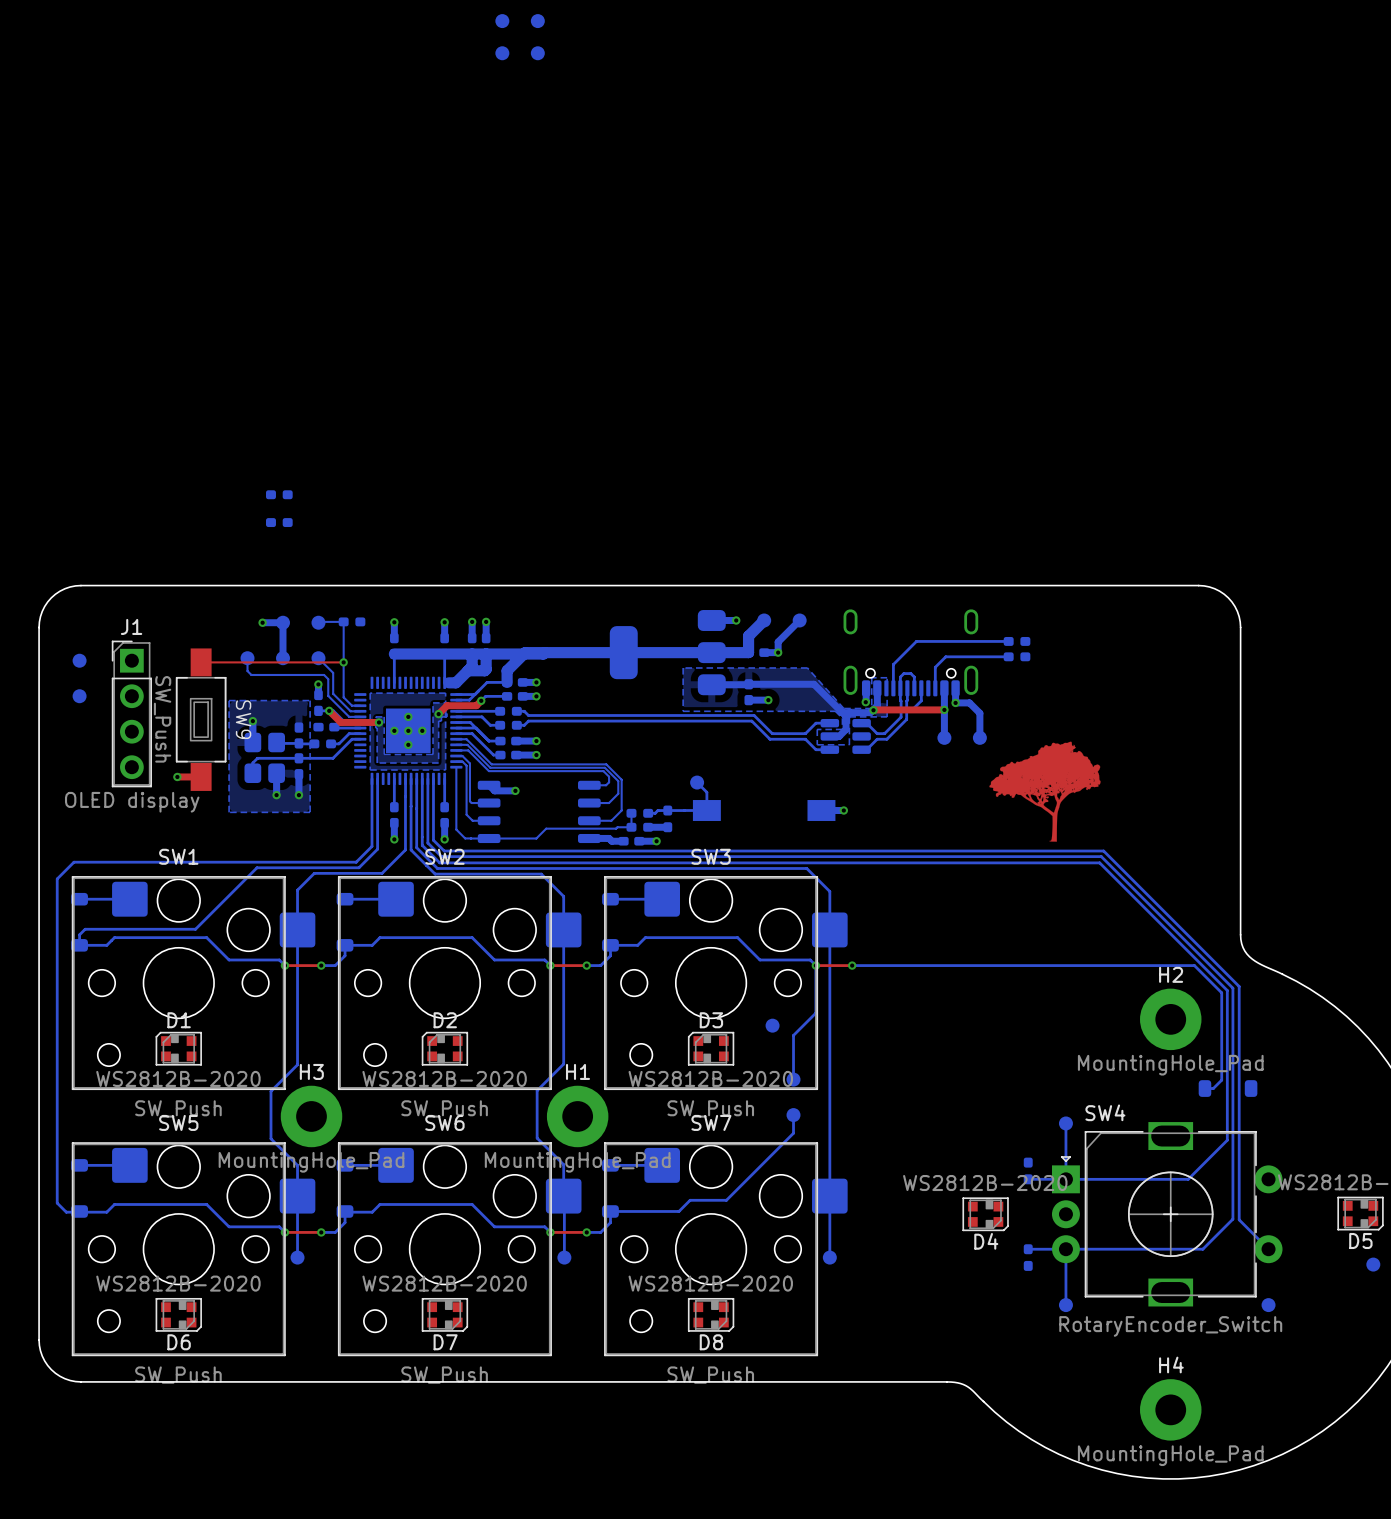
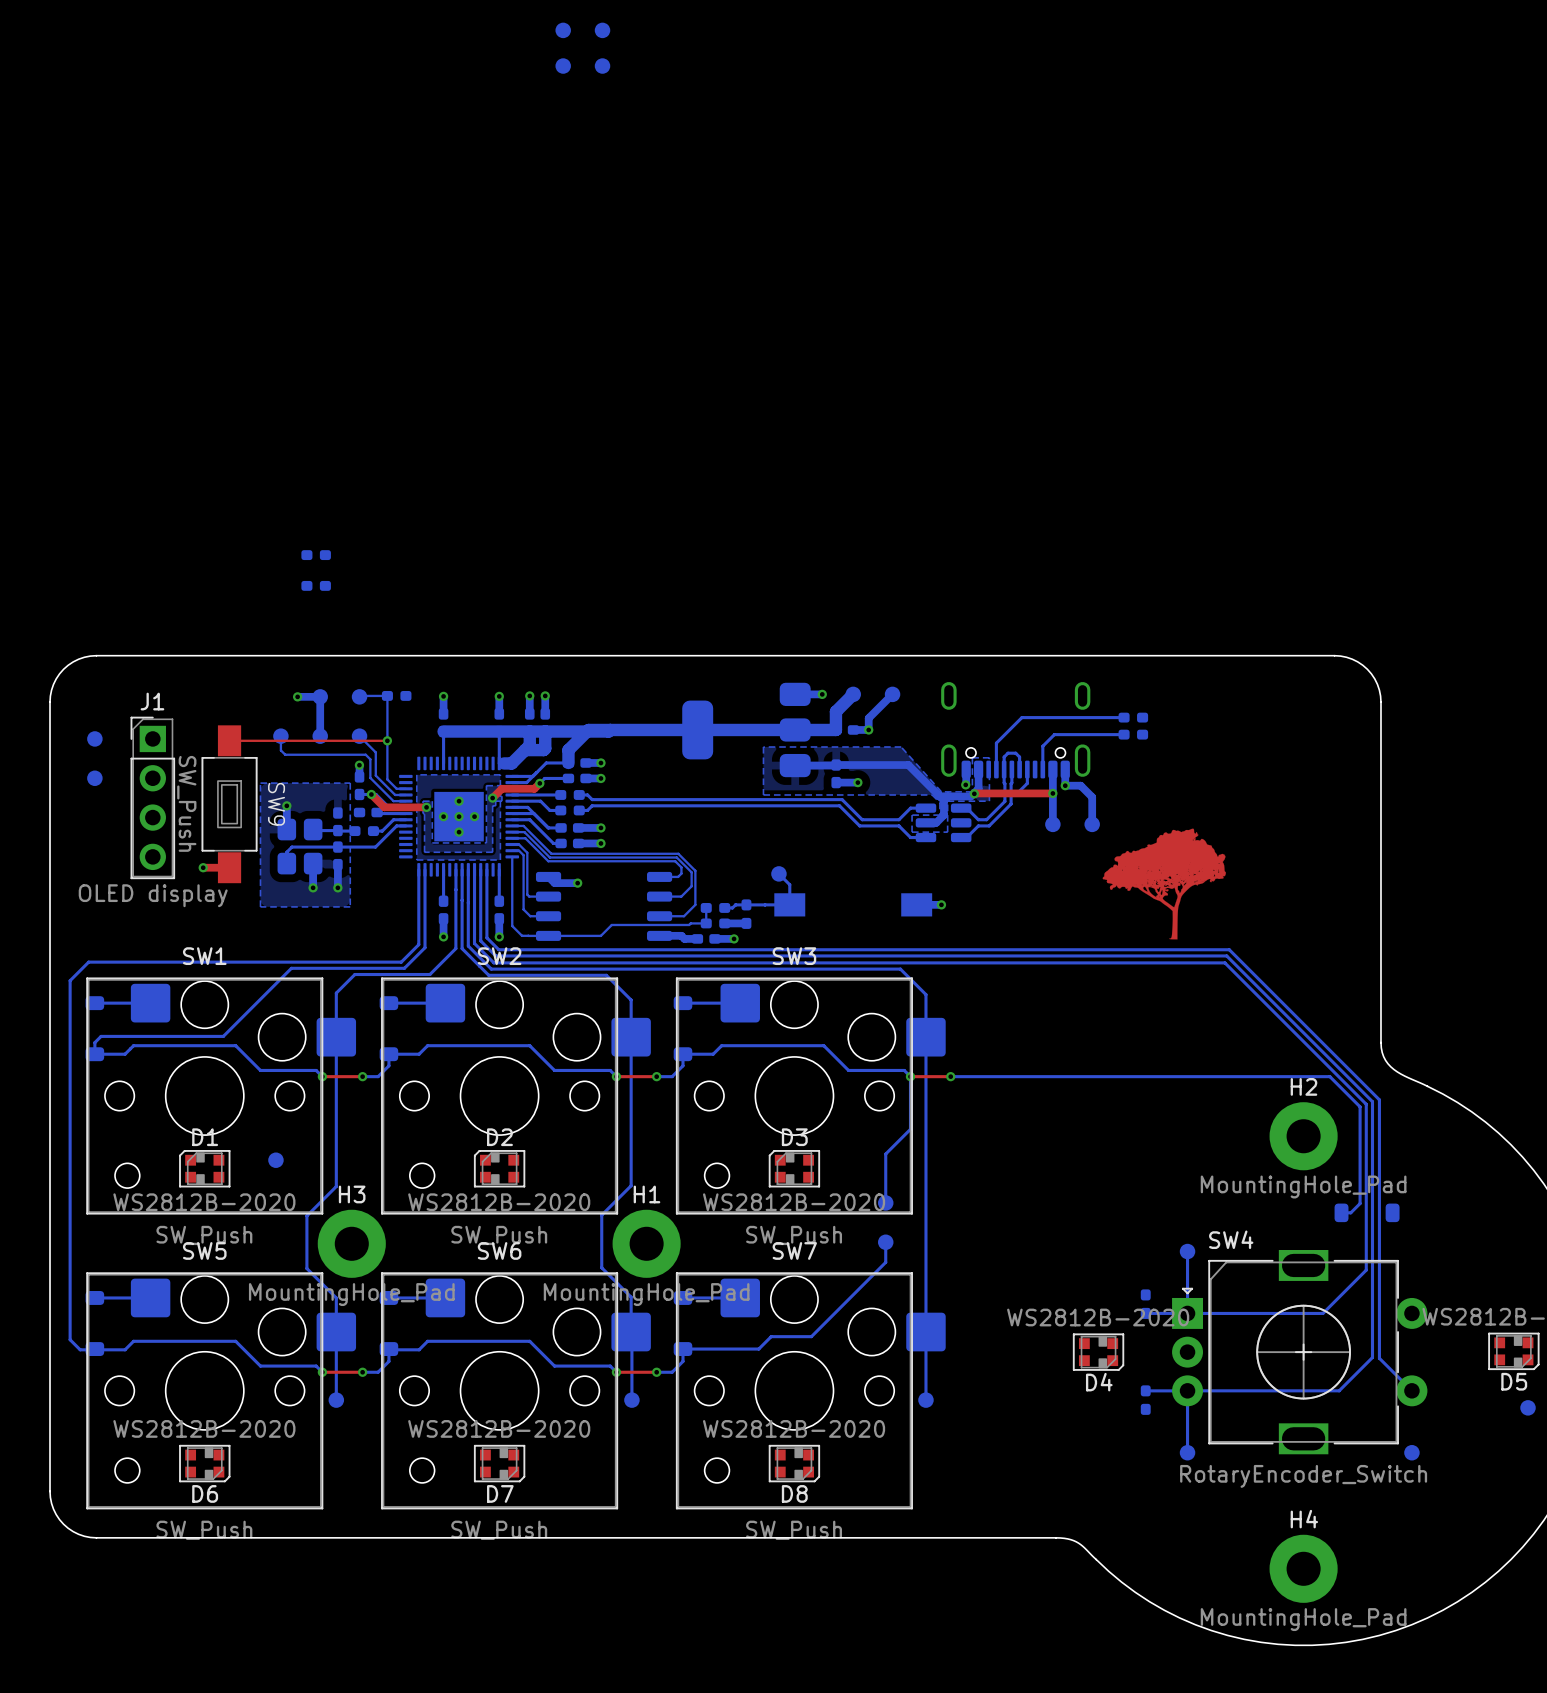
part: (772, 1025) -> none
part: none -> (275, 1160)

